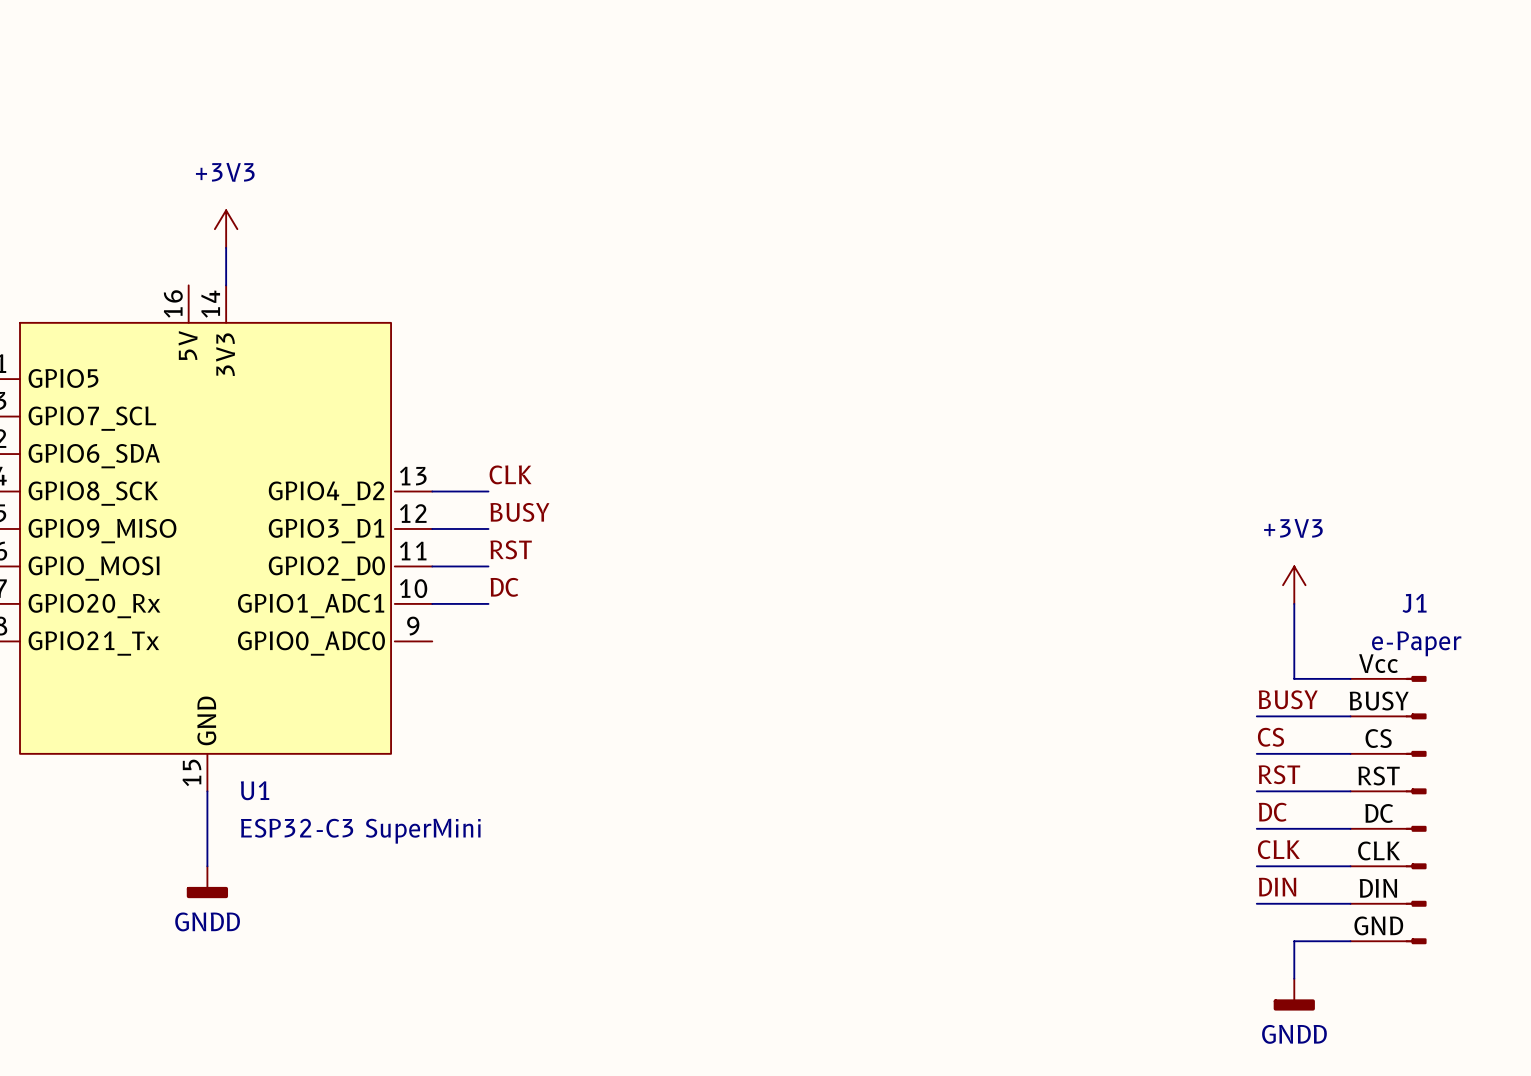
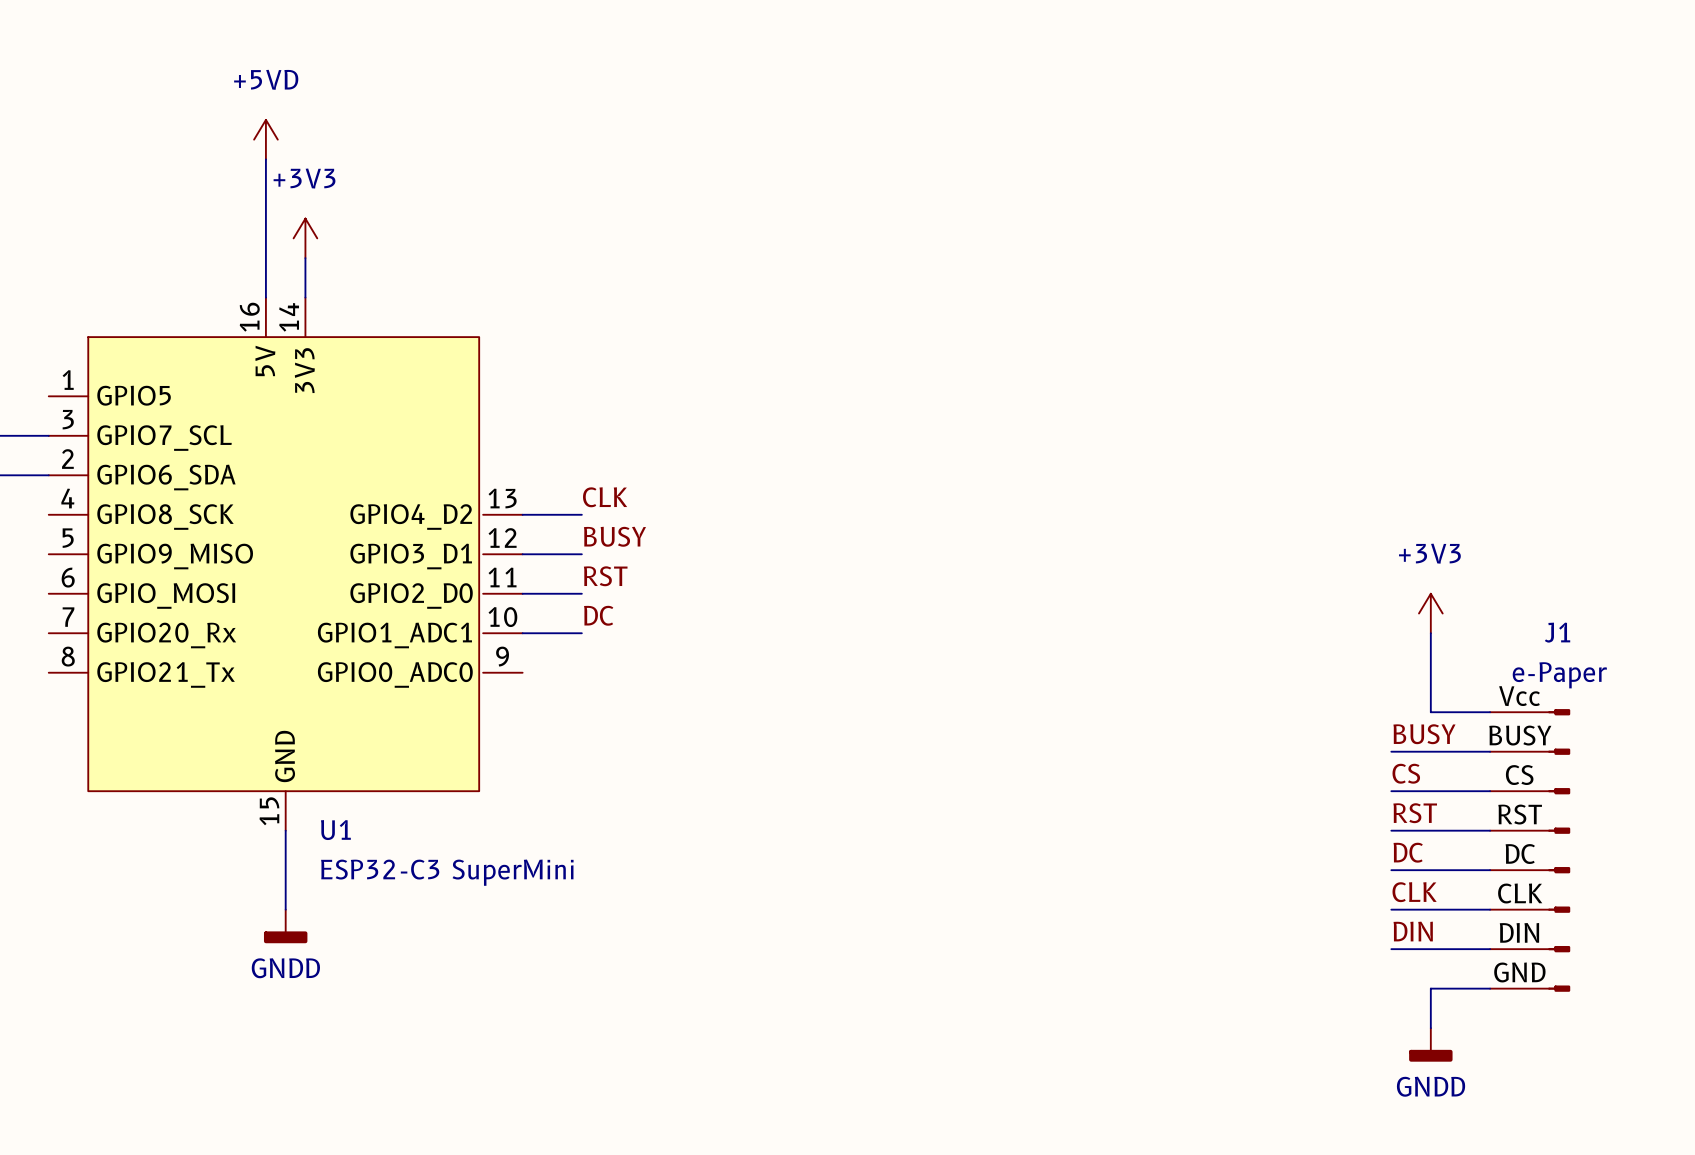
power symbol: none -> +5VD (265, 139)
wire: none -> (265, 159) (265, 297)

